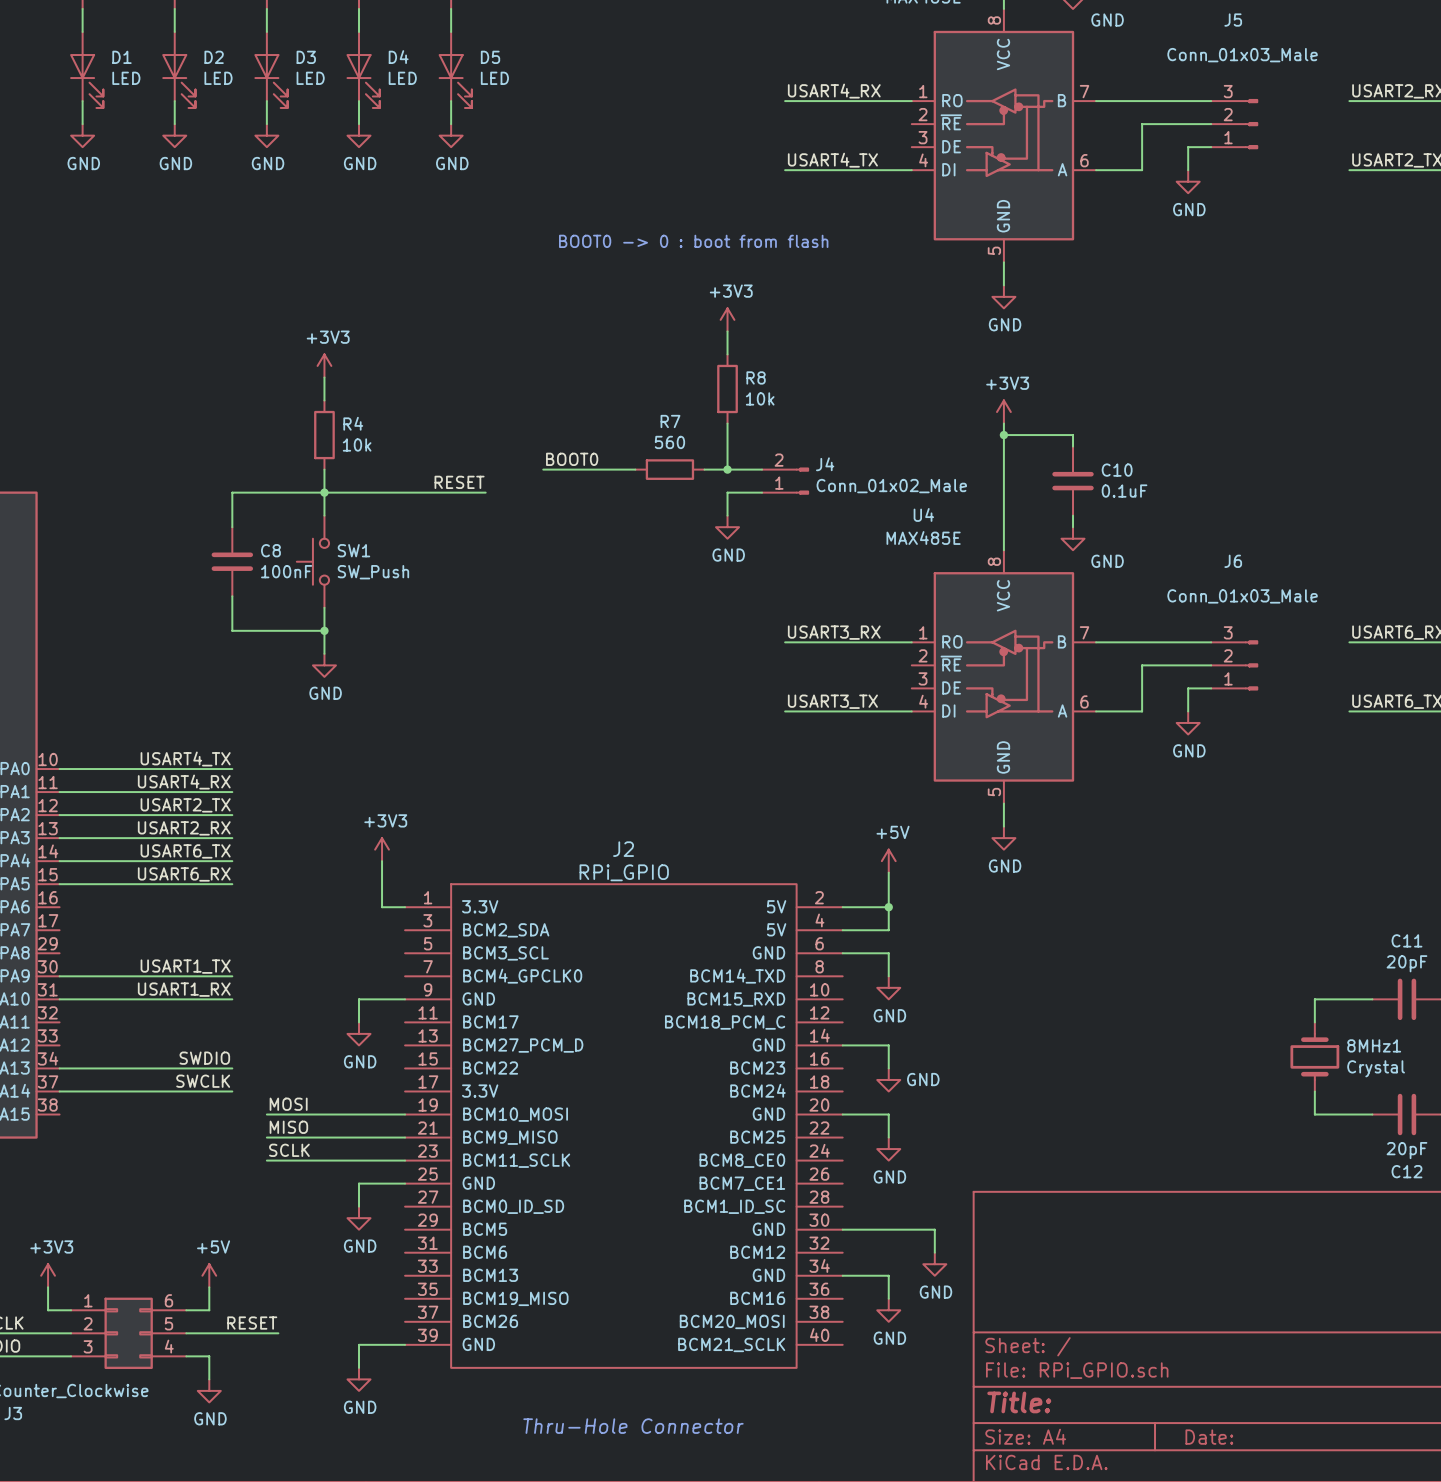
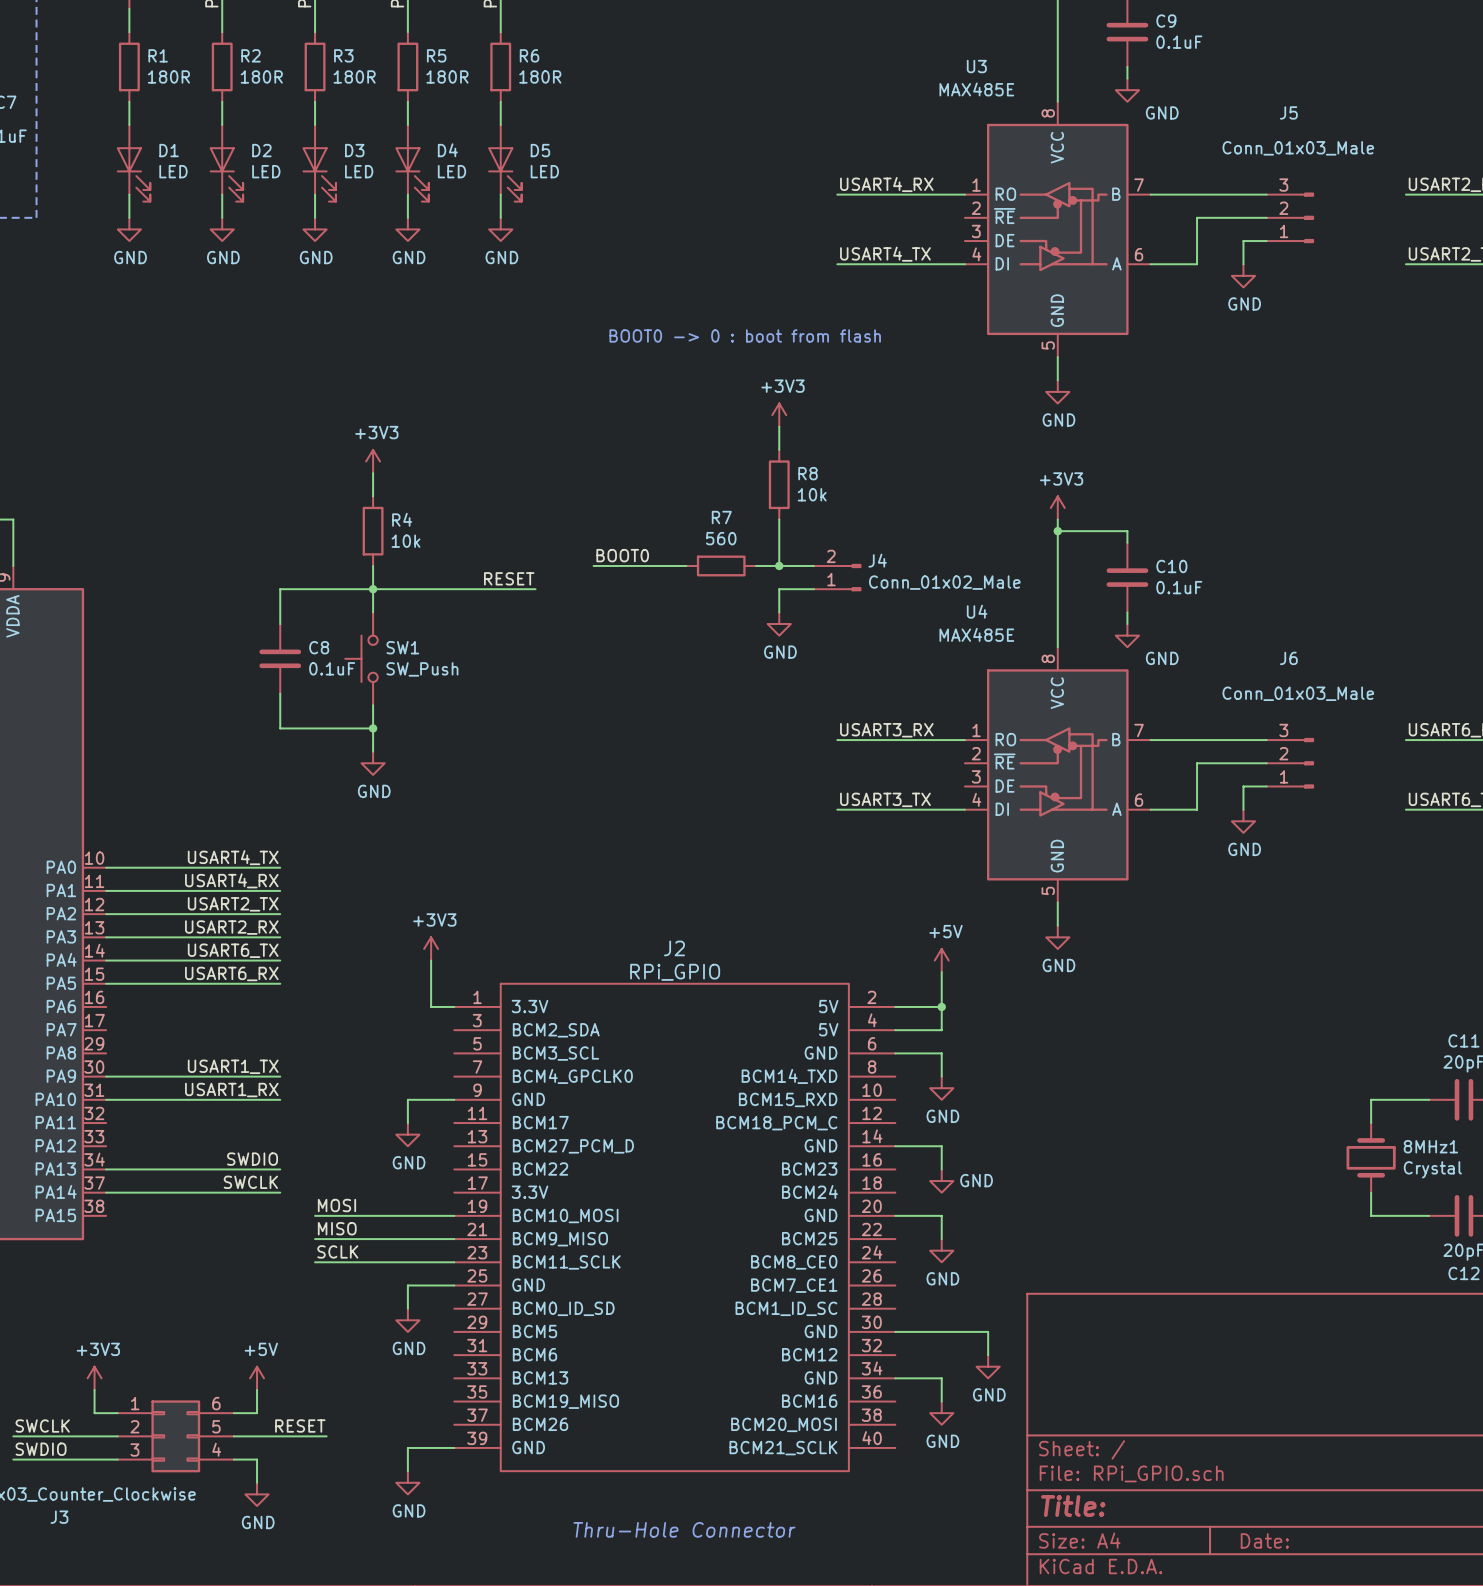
C8 value: 100nF (286, 571) -> 0.1uF (332, 668)

